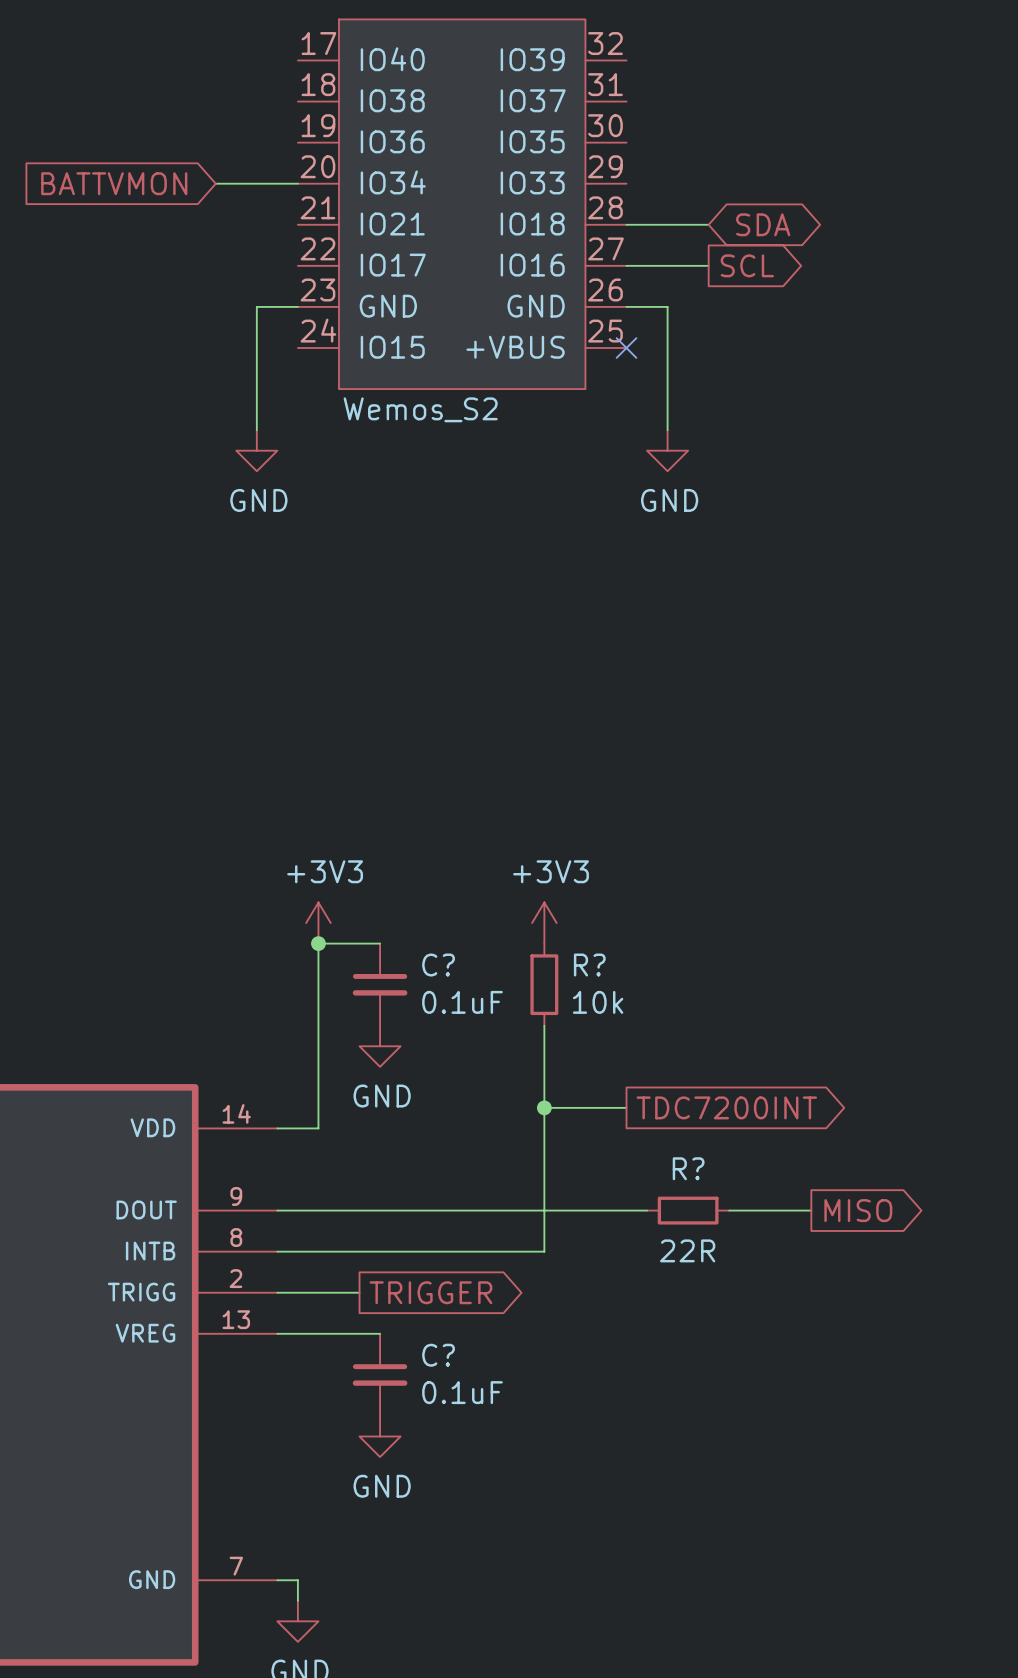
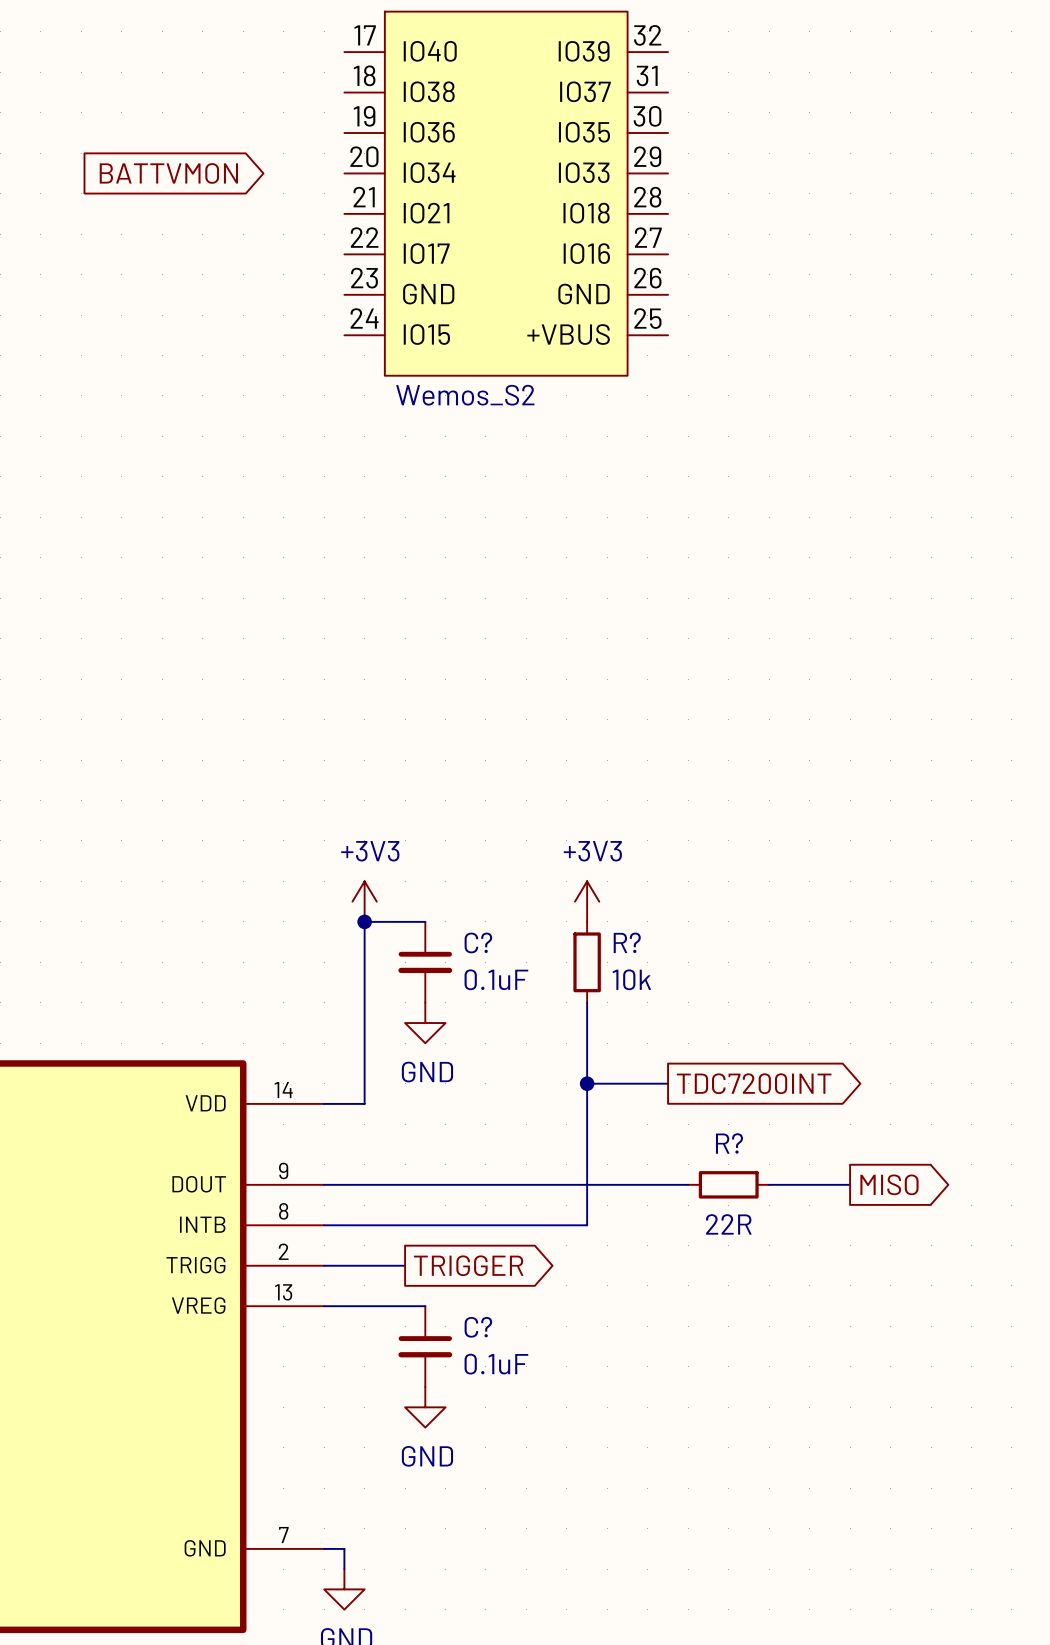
wire: (215, 183) (297, 183) -> none
wire: (626, 224) (708, 224) -> none
global label: SDA (763, 224) -> none
wire: (626, 265) (708, 265) -> none
global label: SCL (747, 265) -> none
wire: (297, 306) (256, 306) (256, 430) -> none
wire: (626, 306) (667, 306) (667, 430) -> none
no-connect mark: (626, 348) -> none
power symbol: GND (256, 450) -> none
power symbol: GND (667, 450) -> none

